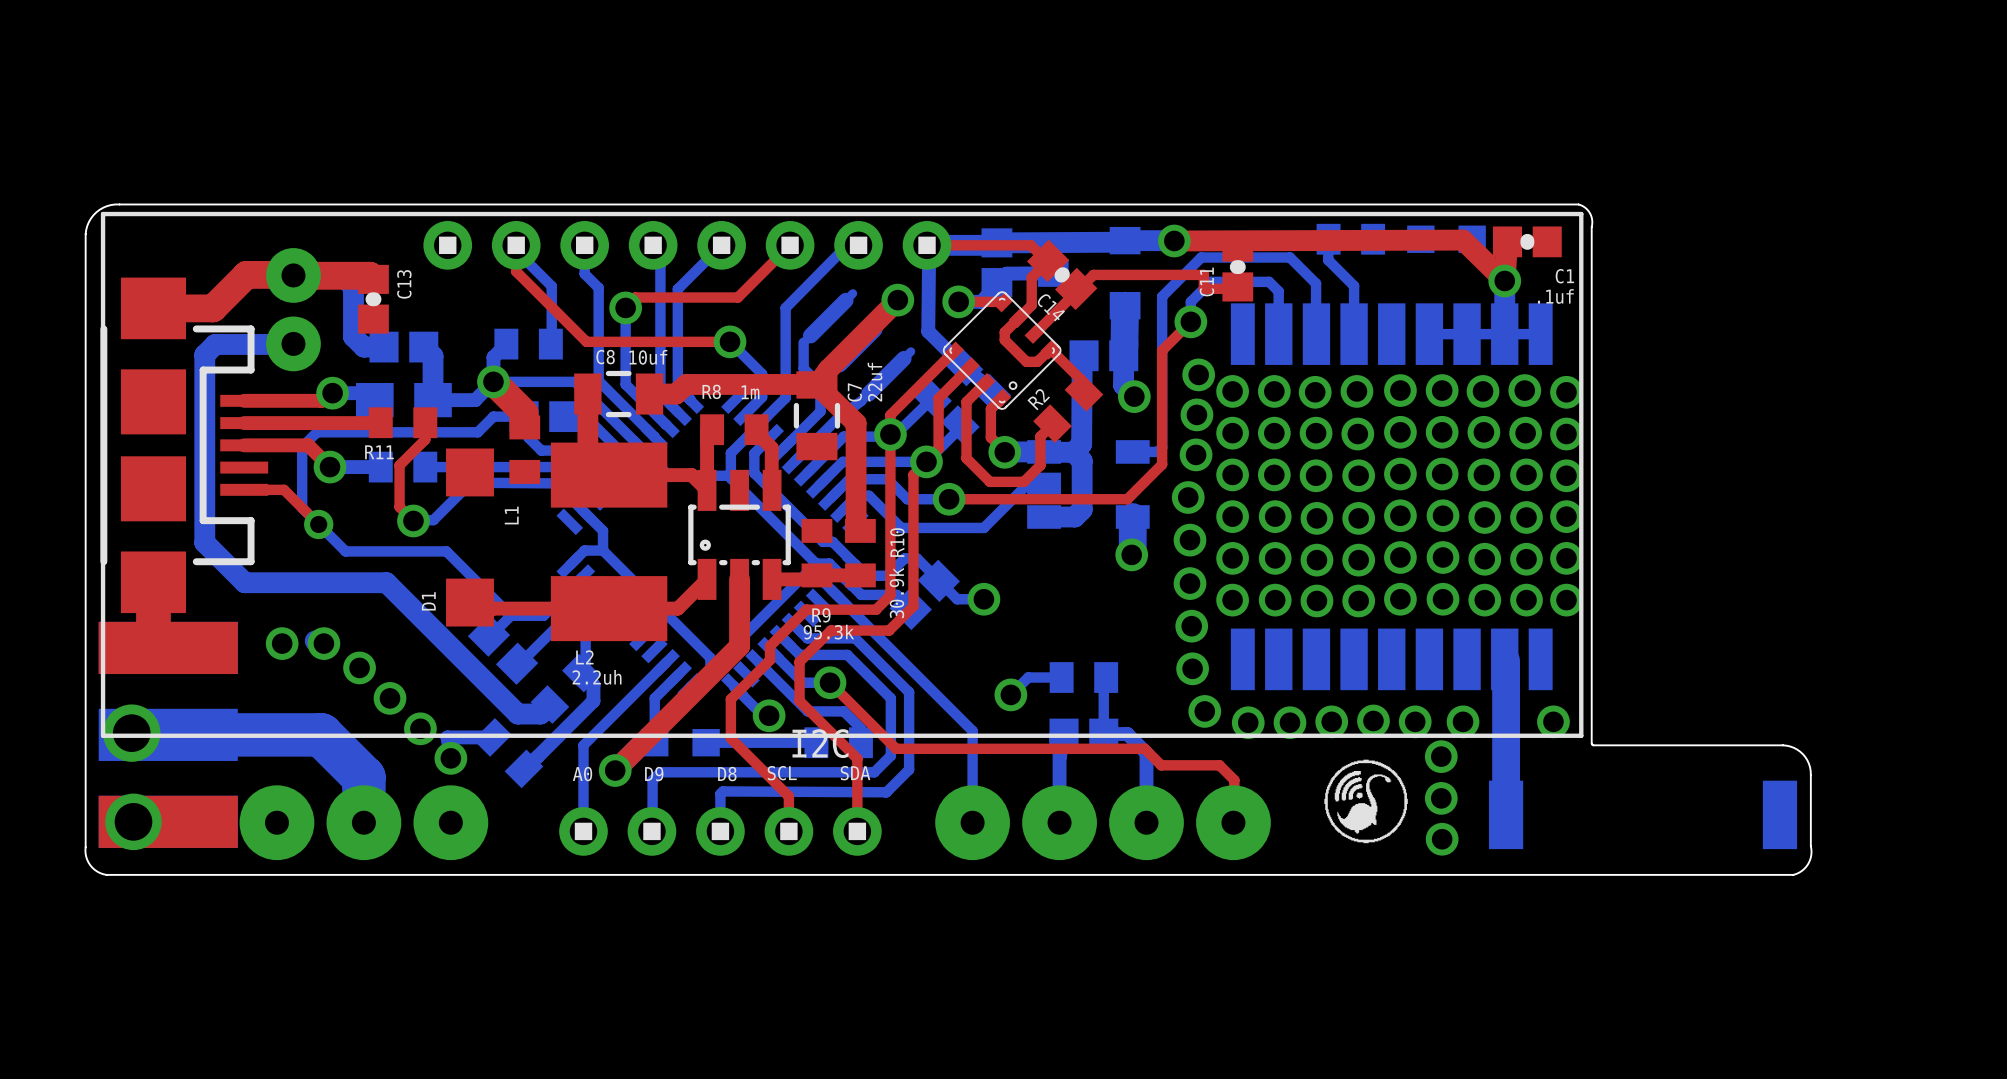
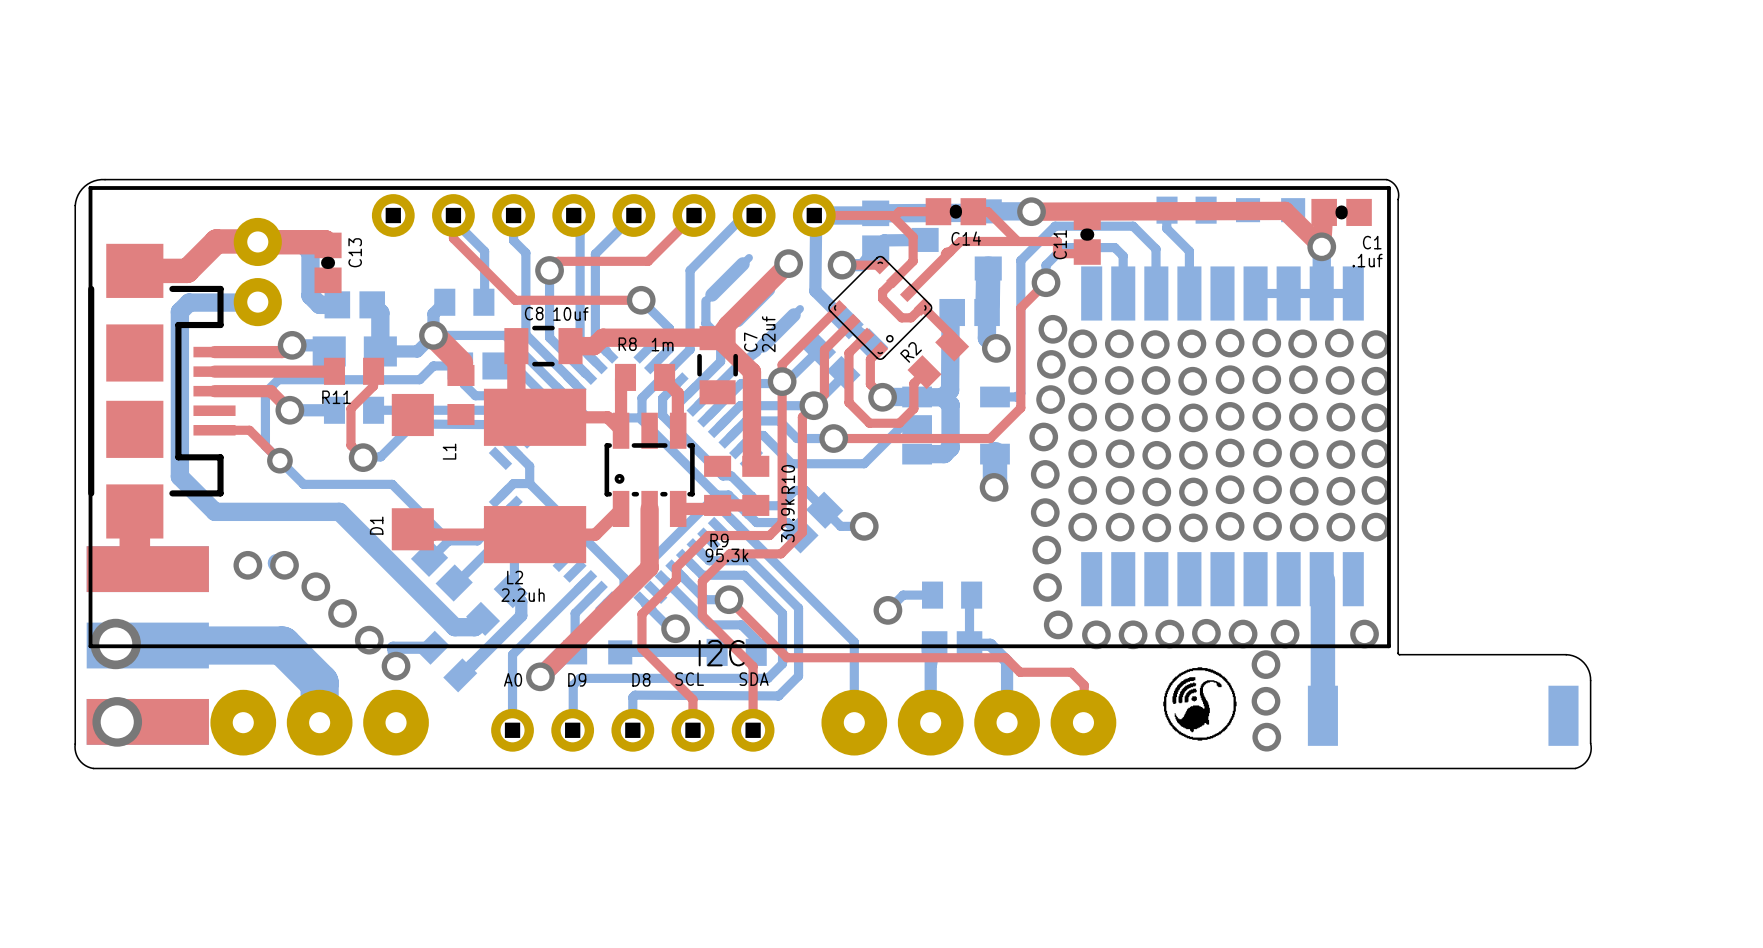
top track: none -> (938, 211) (899, 211) (893, 217)
top track: none -> (973, 211) (987, 211) (1017, 241)
top track: (1015, 245) (1030, 245) (1048, 260) -> none
top track: (1048, 261) (1031, 277) (1031, 305) -> (891, 215) (913, 236) (913, 261) (906, 268)
C14 rotation: 0° (1062, 274) -> 45° counterclockwise (955, 211)
C14 position: (1062, 274) -> (955, 211)

